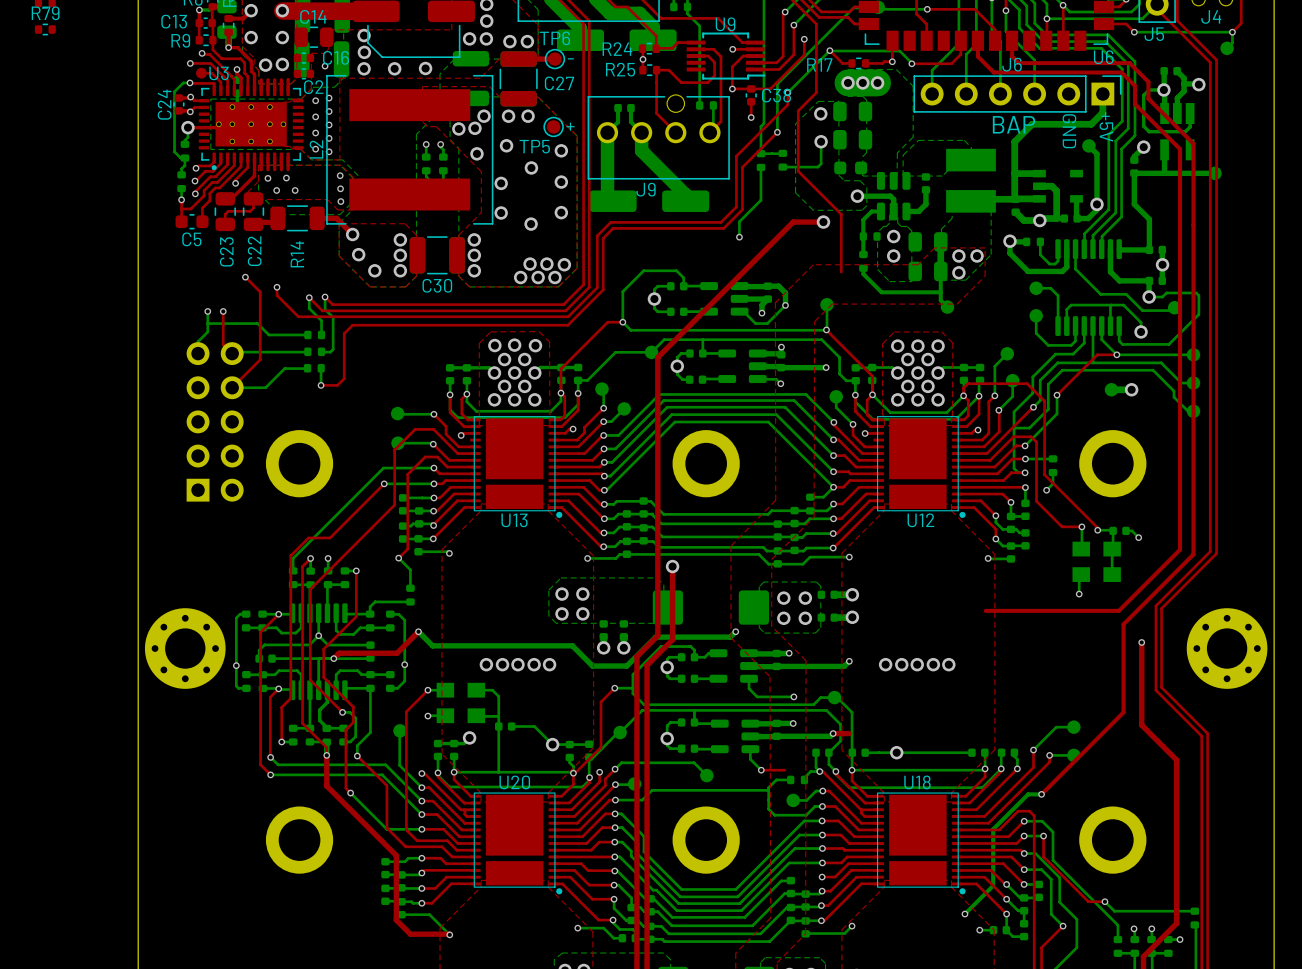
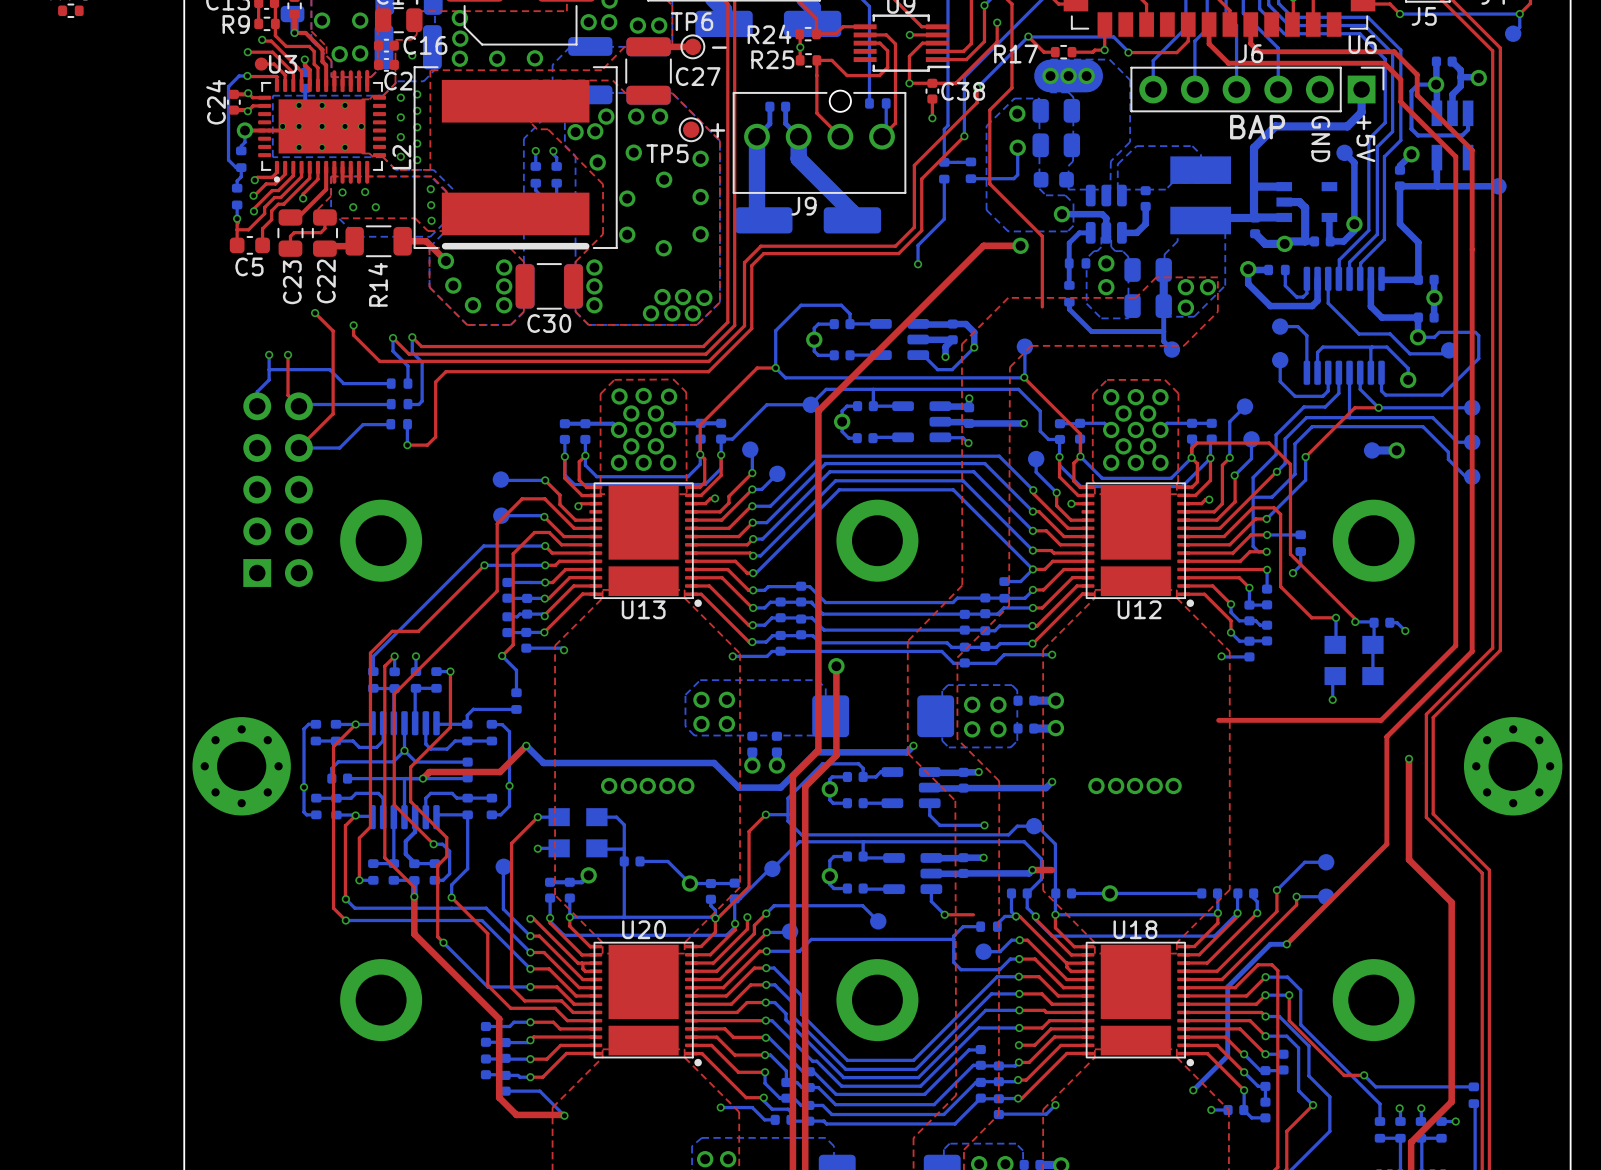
L2 footprint: [326, 74, 494, 225] -> [413, 66, 618, 250]

